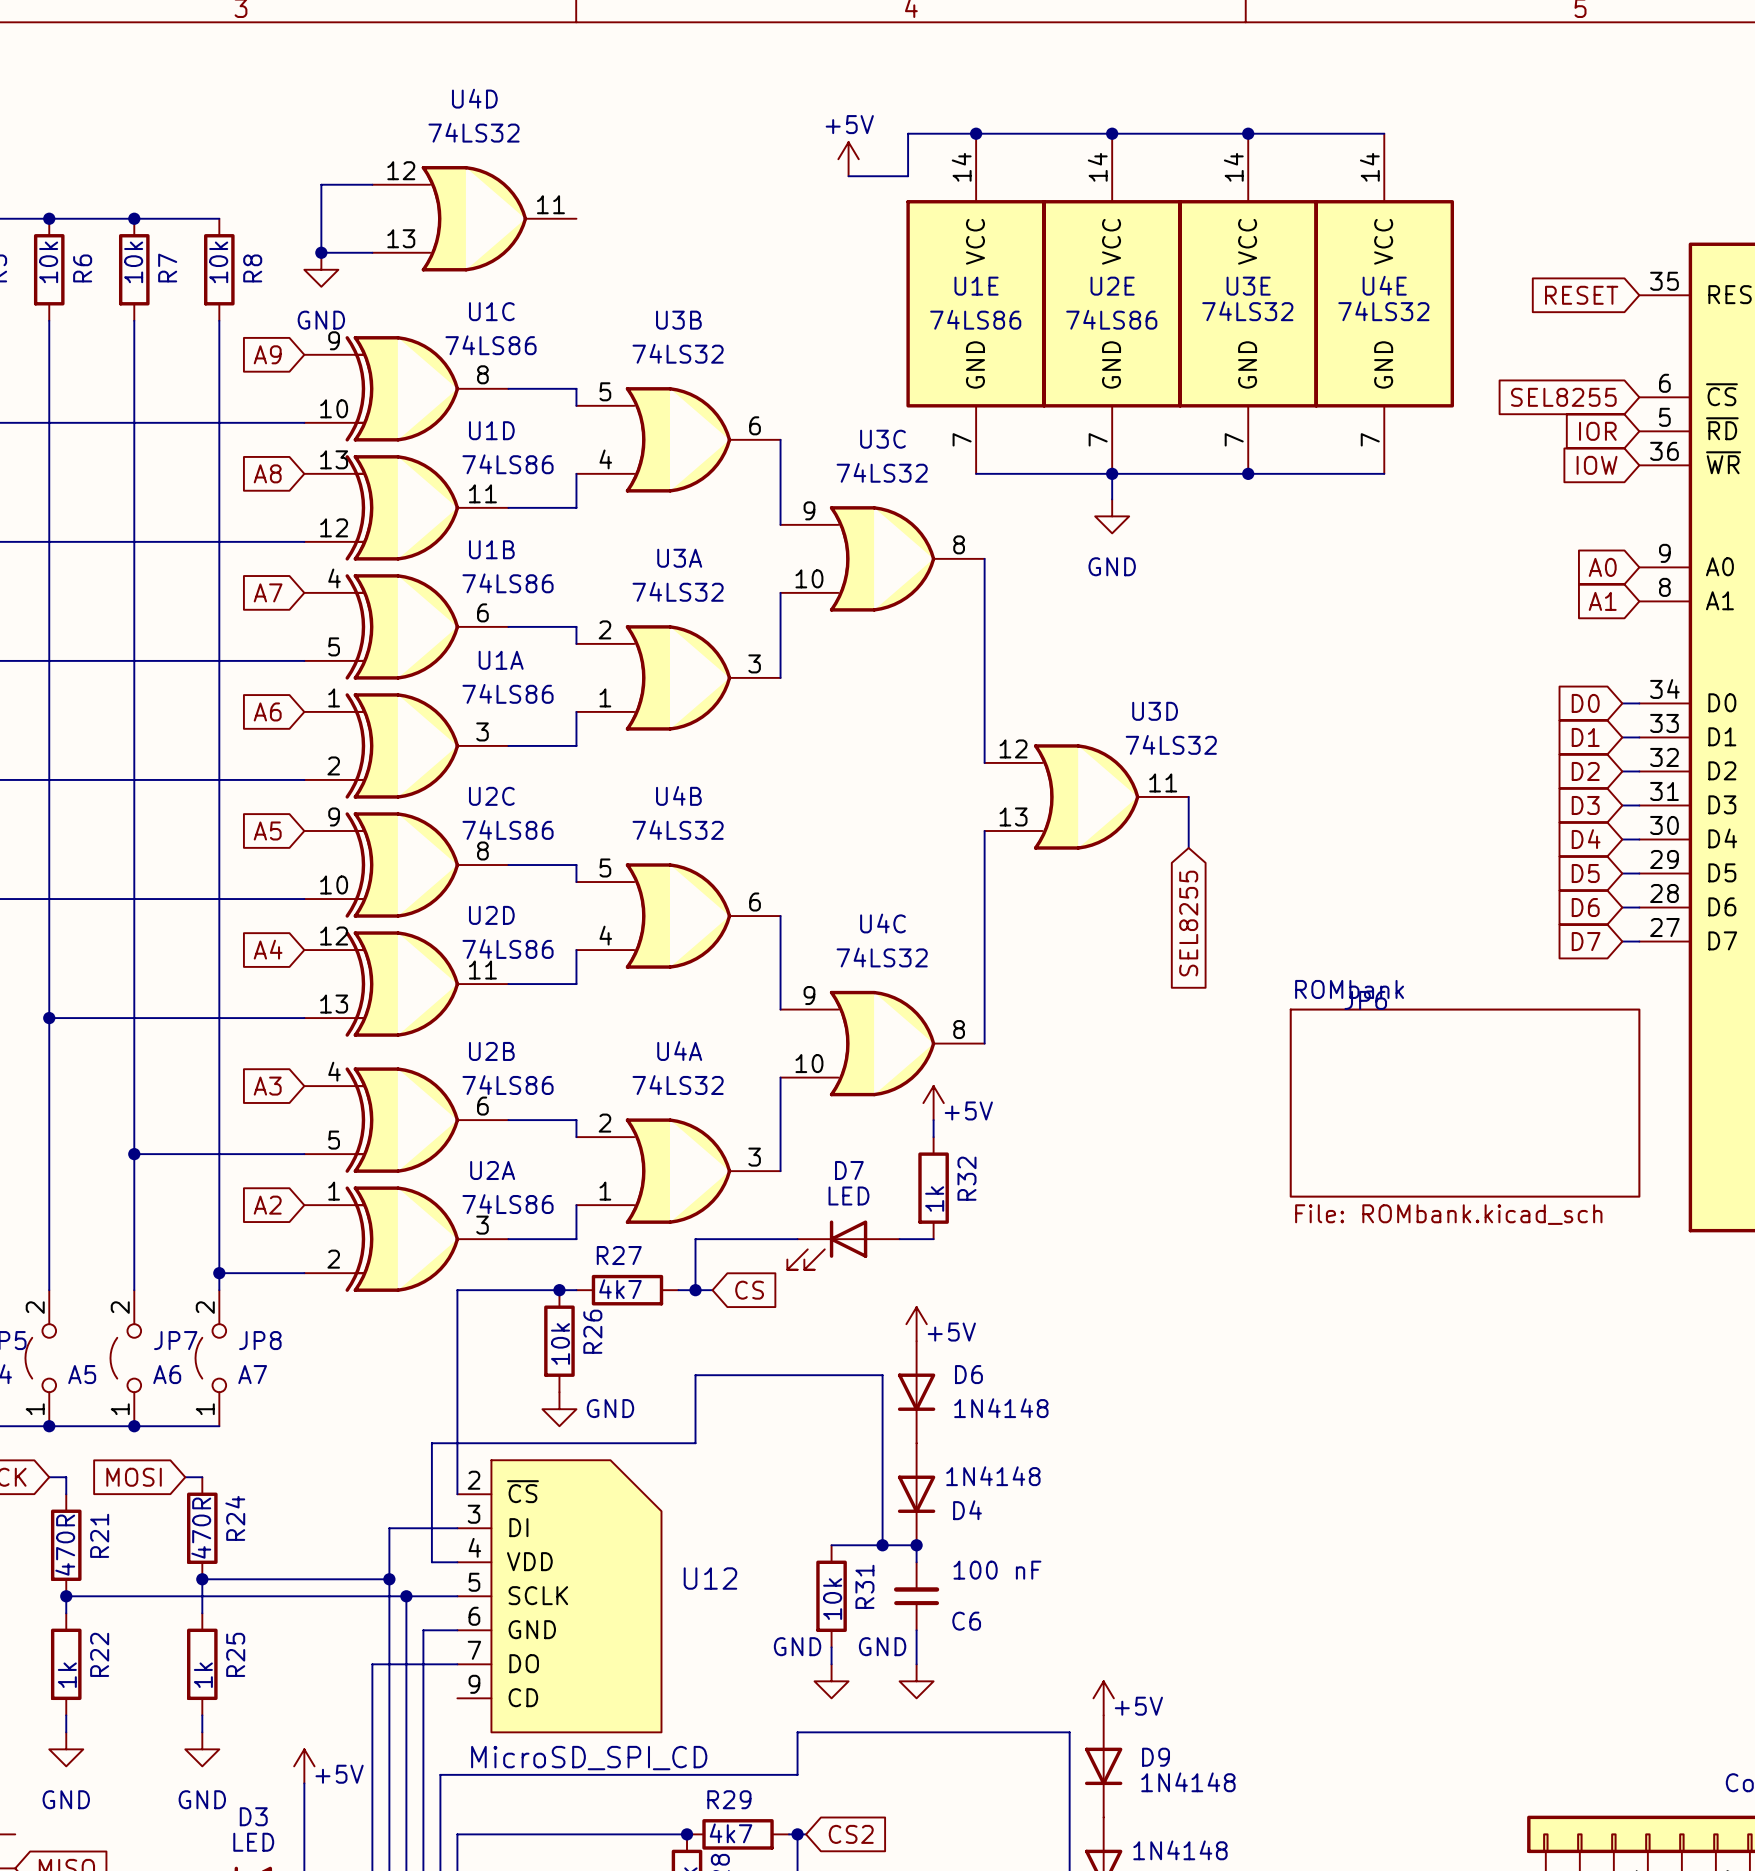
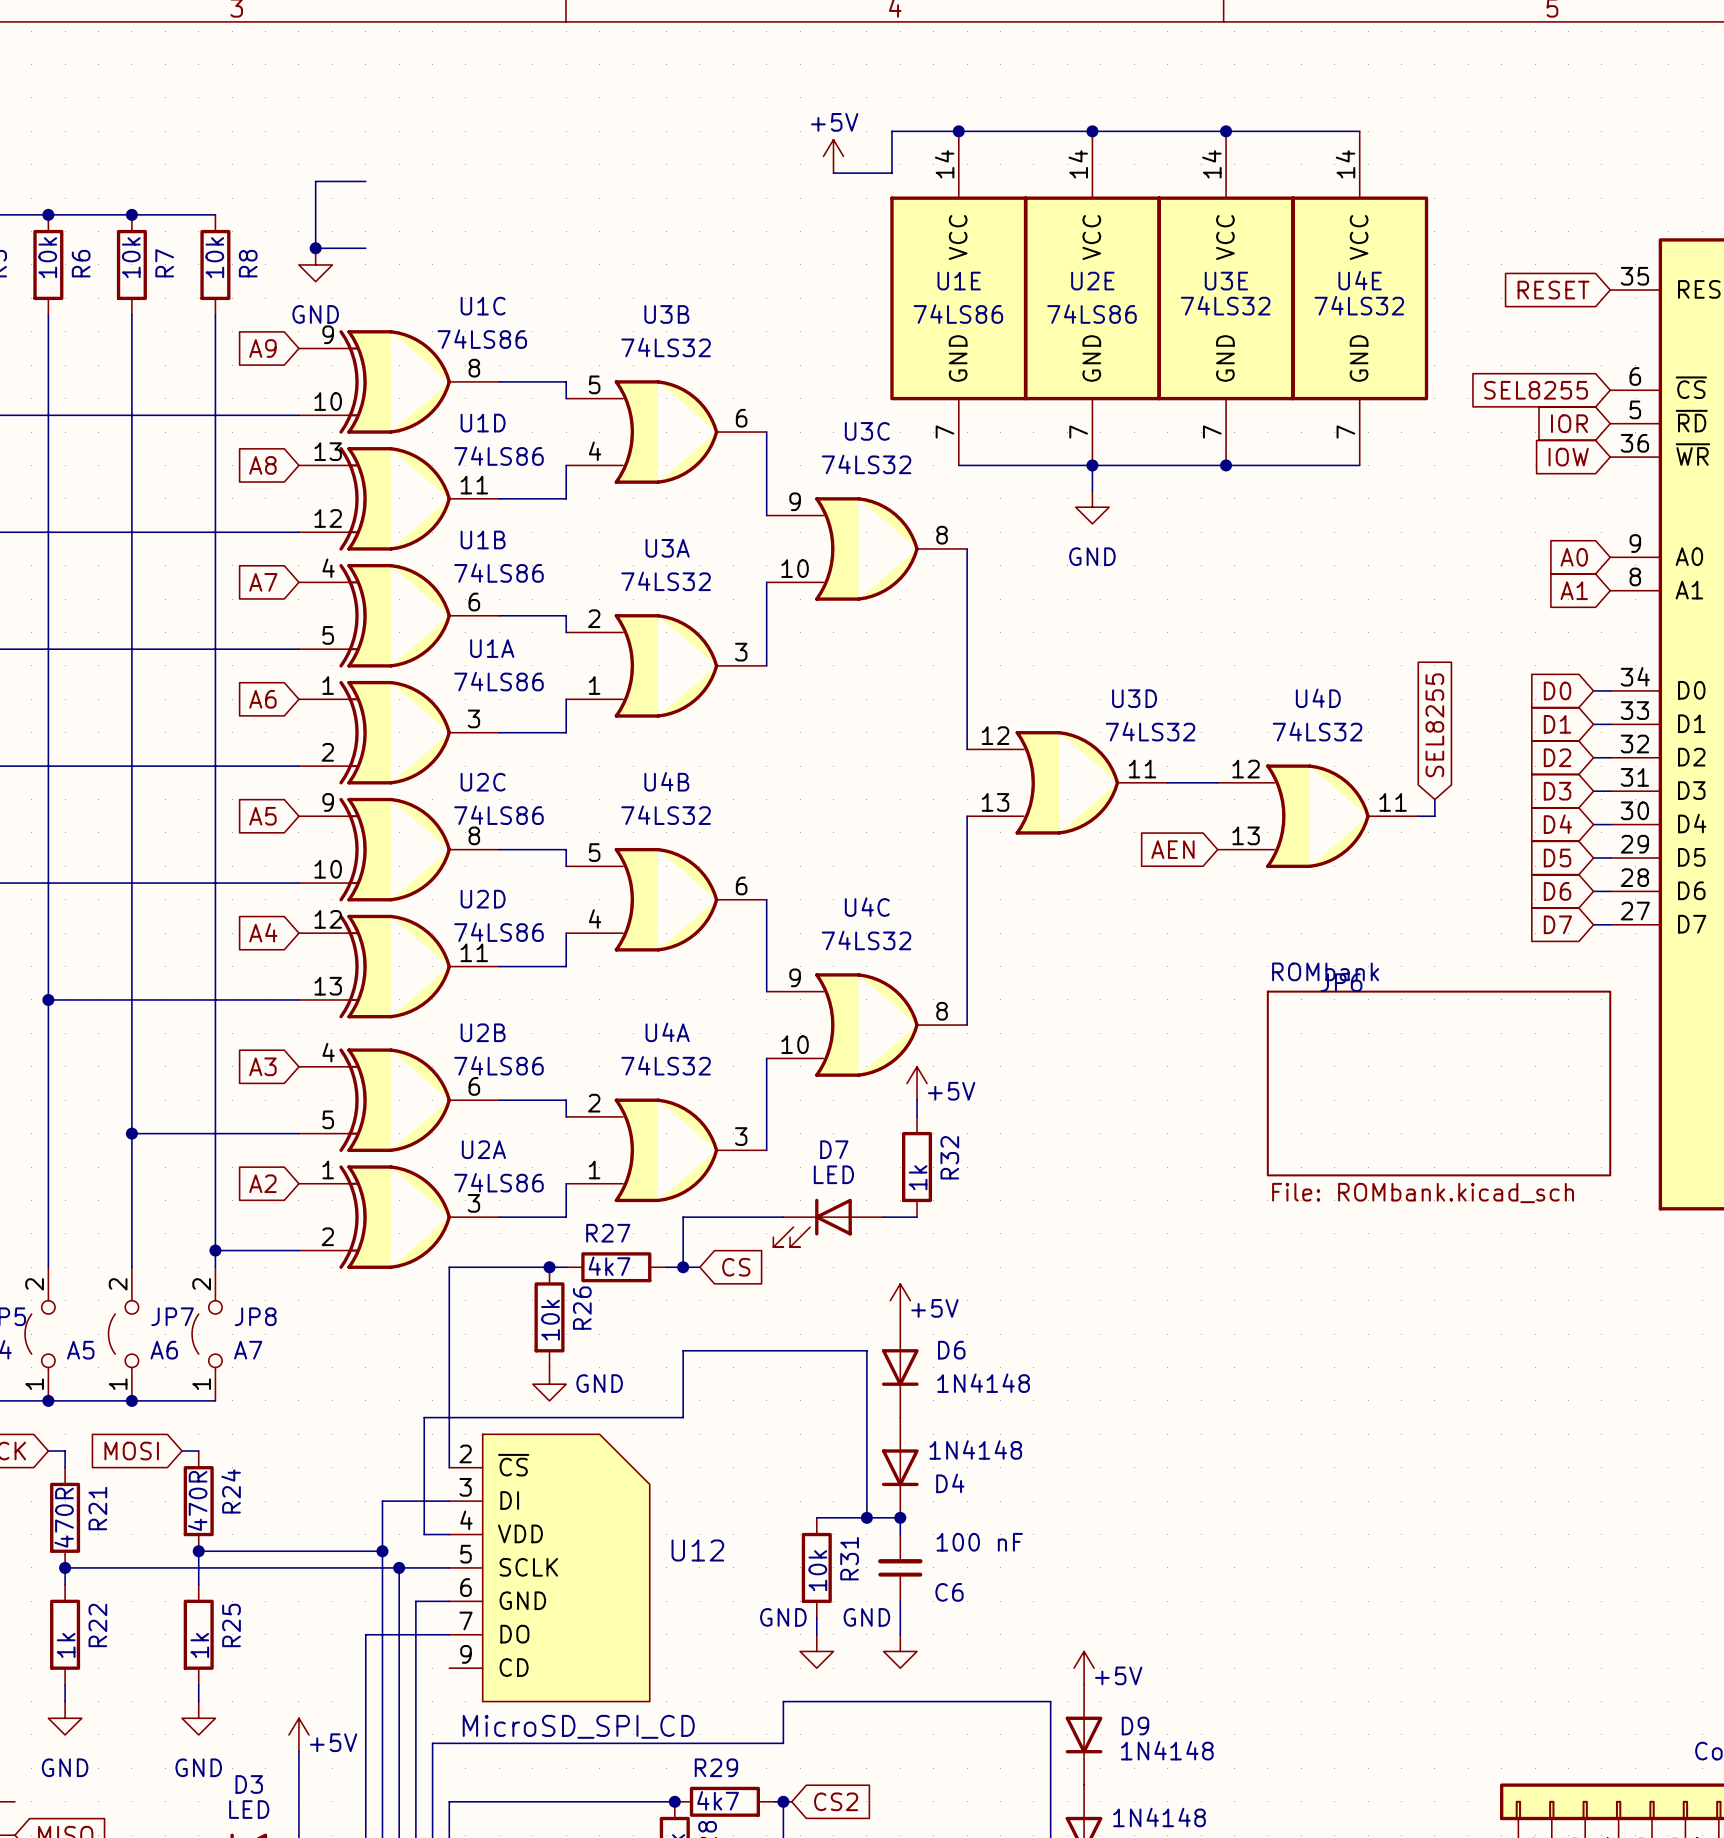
U4D position: (474, 218) -> (1317, 816)
wire: (1188, 796) (1188, 848) -> (1167, 782) (1217, 782)
wire: none -> (1434, 799) (1434, 816) (1418, 816)
global label: none -> AEN (1172, 849)
global label rotation: 0° (1188, 923) -> 180° (1434, 725)
global label position: SEL8255 (1188, 923) -> SEL8255 (1434, 725)

